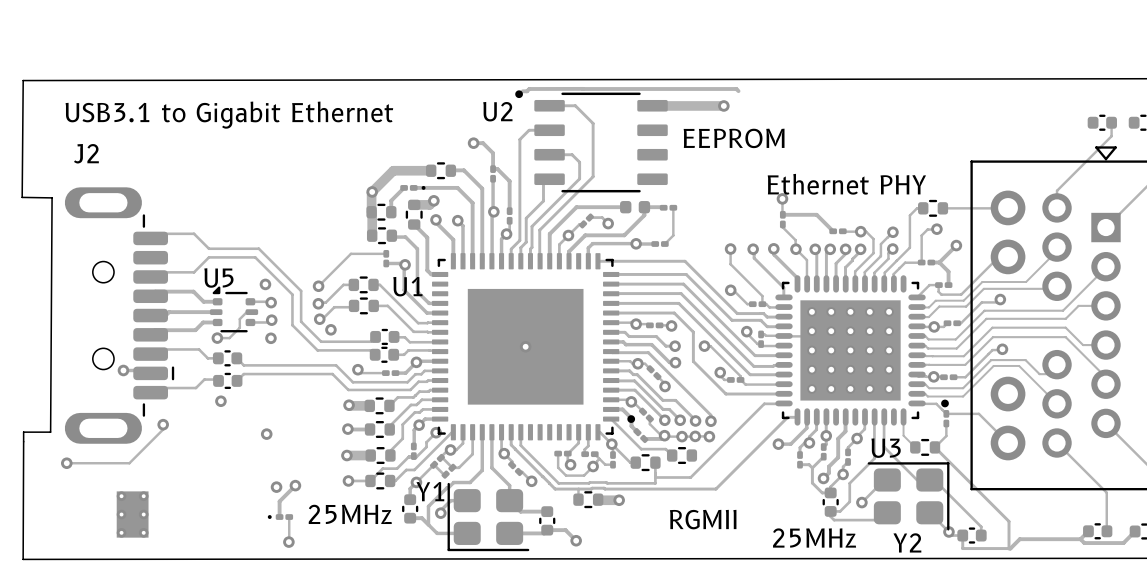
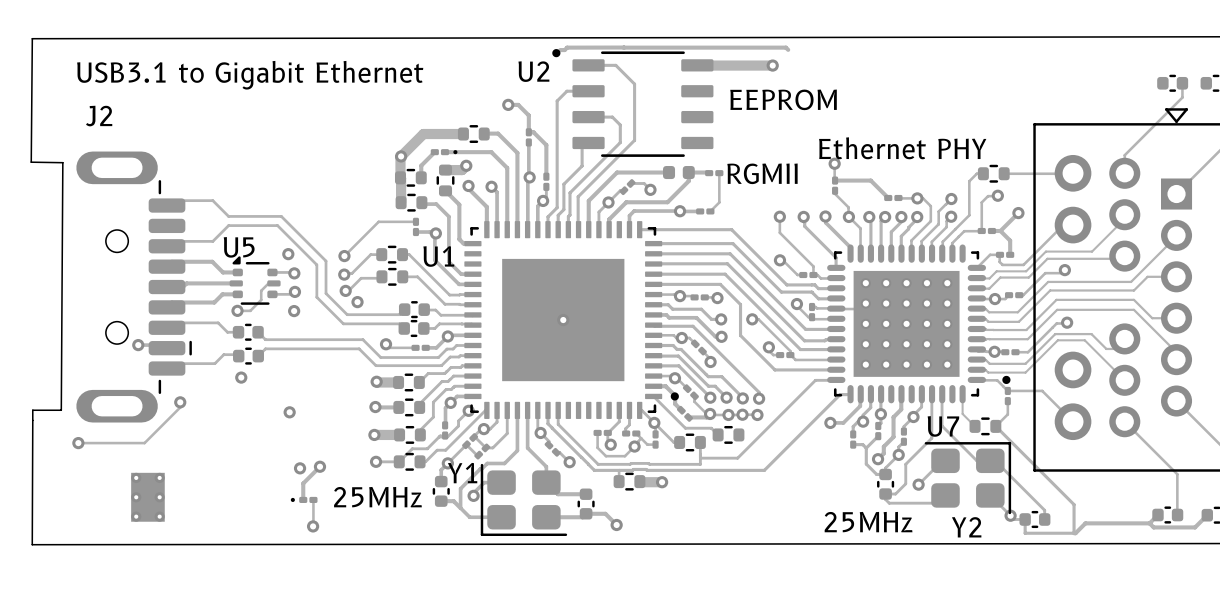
U3 name: U3 (886, 448) -> U7 (943, 426)
text position: RGMII (703, 519) -> RGMII (762, 173)

